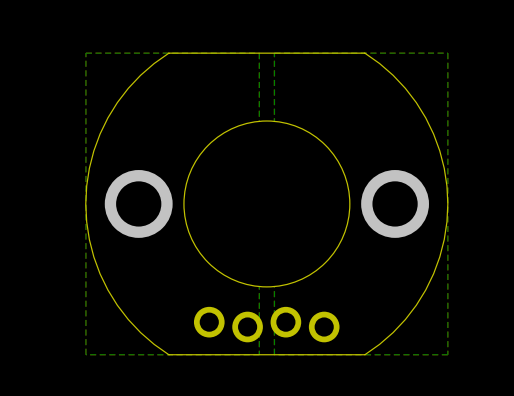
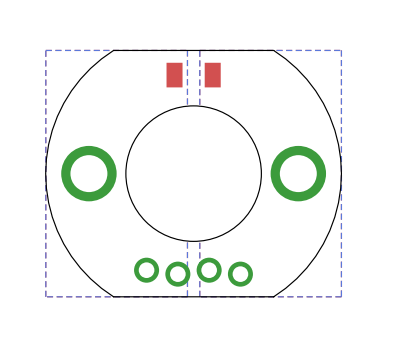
part: none -> (193, 75)

